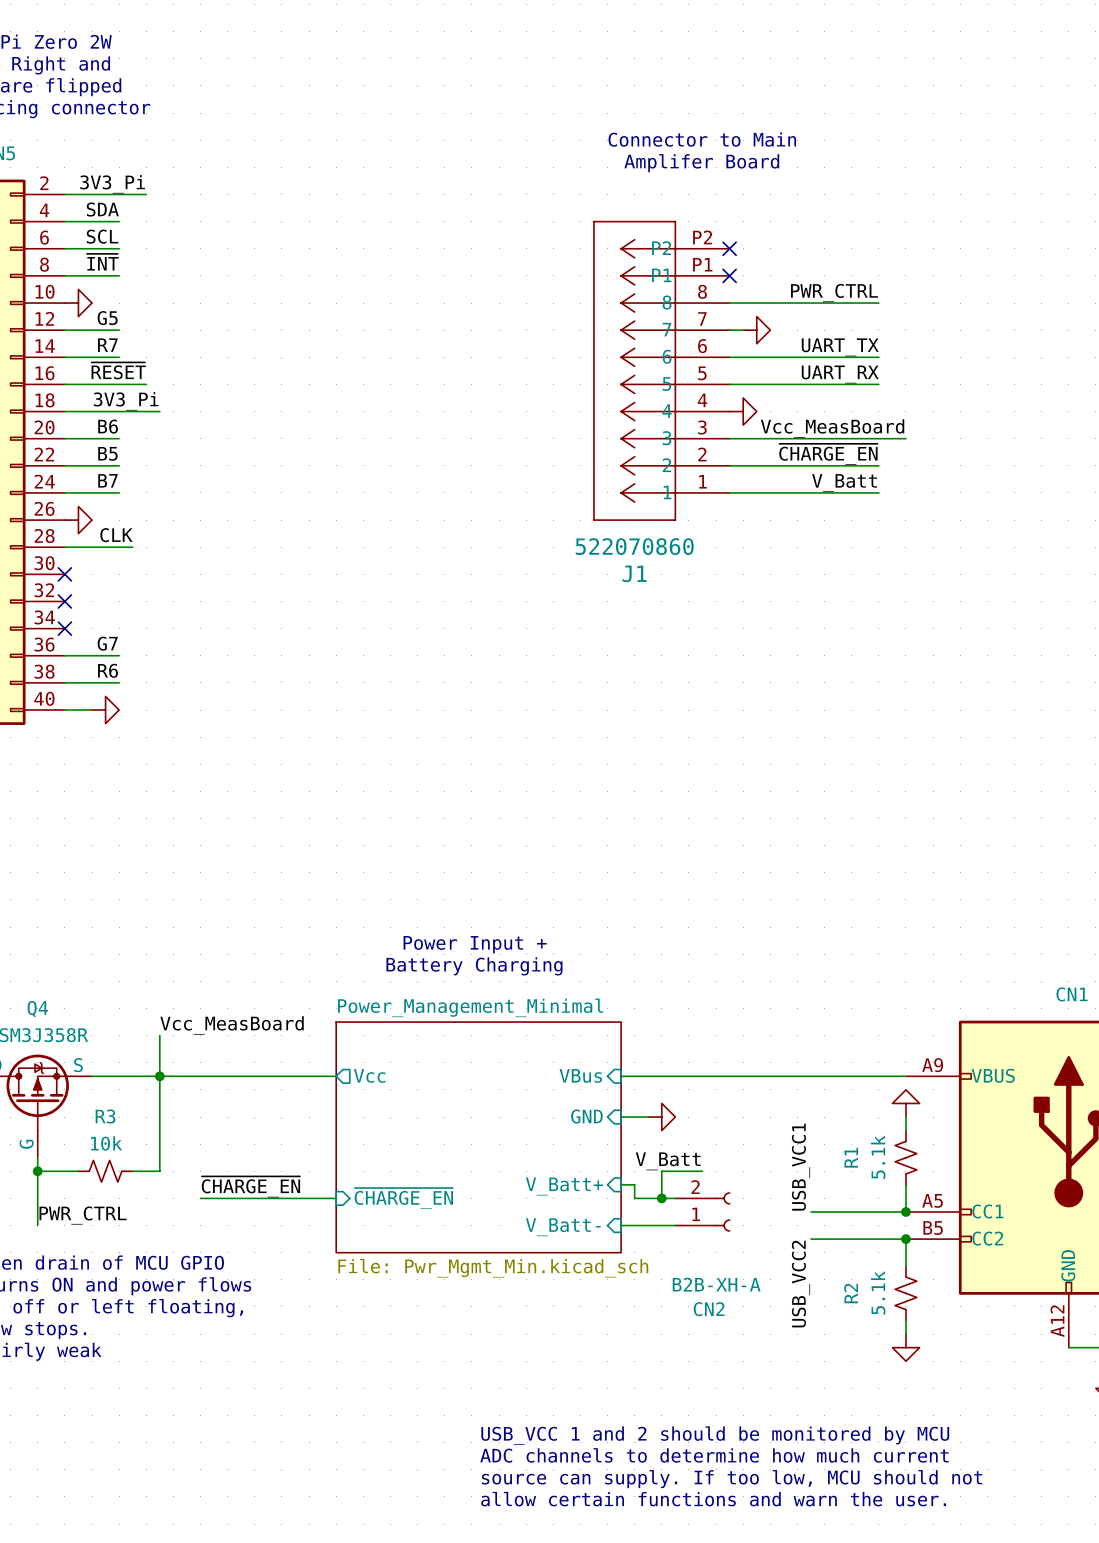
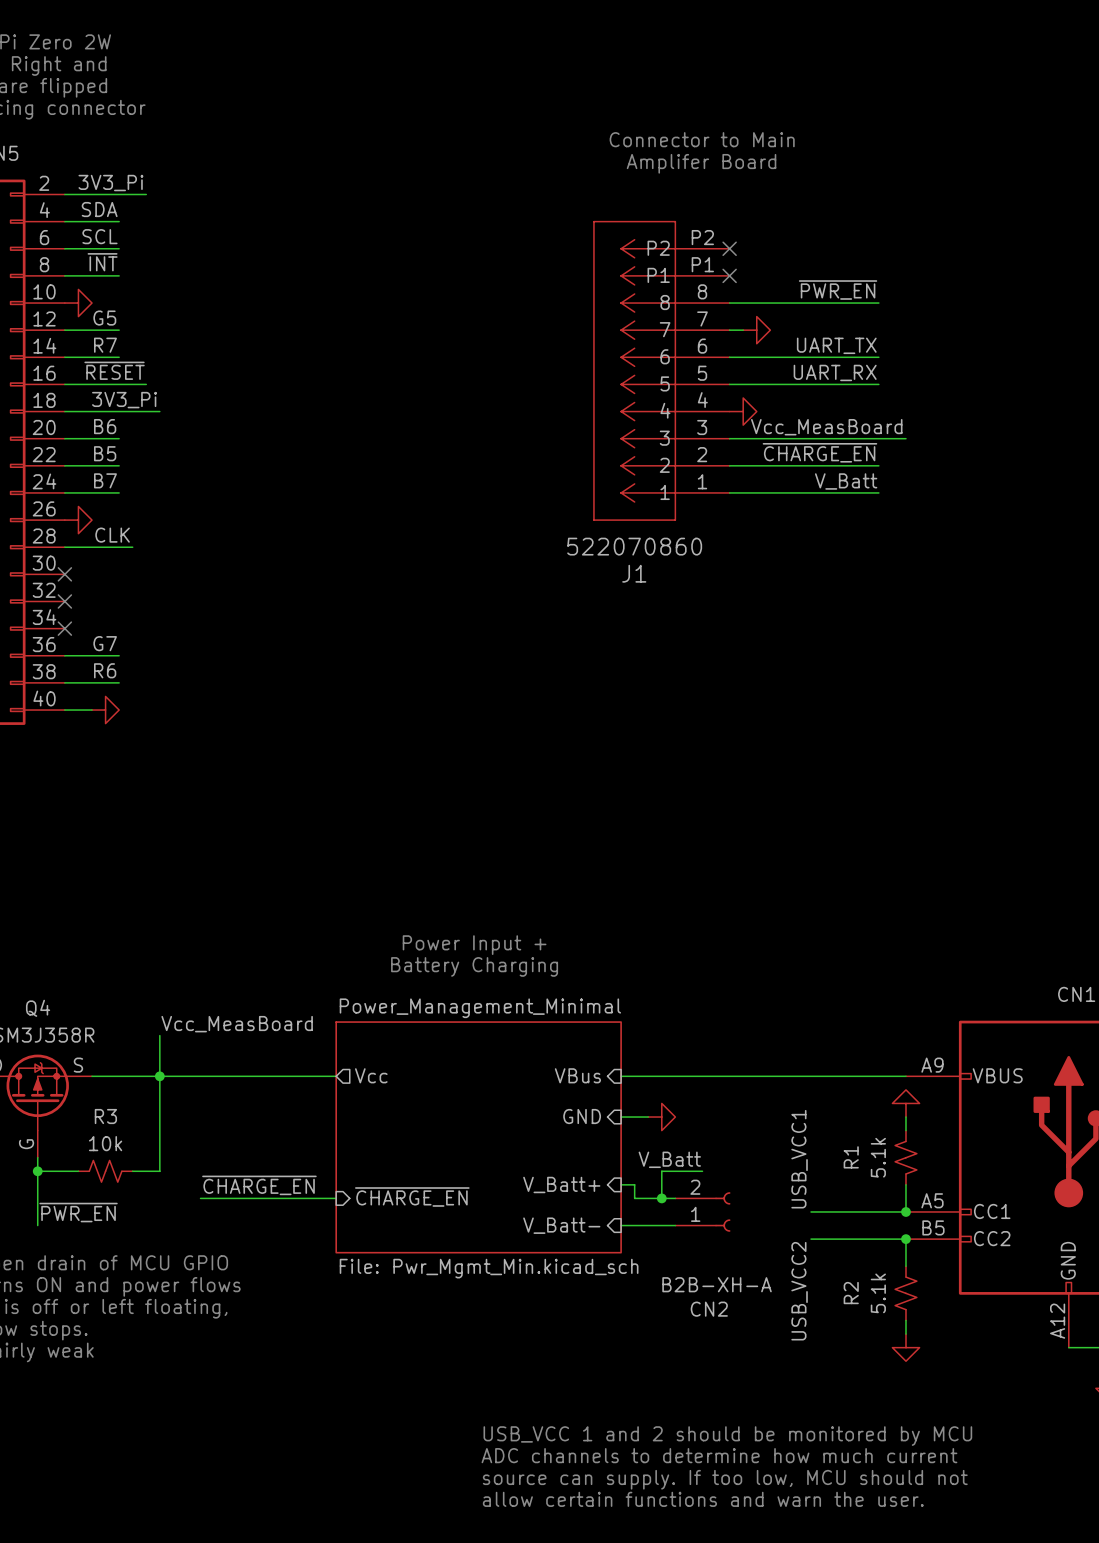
label: PWR_CTRL (834, 292) -> ~{PWR_EN} (838, 290)
label: PWR_CTRL (83, 1215) -> ~{PWR_EN} (78, 1212)

